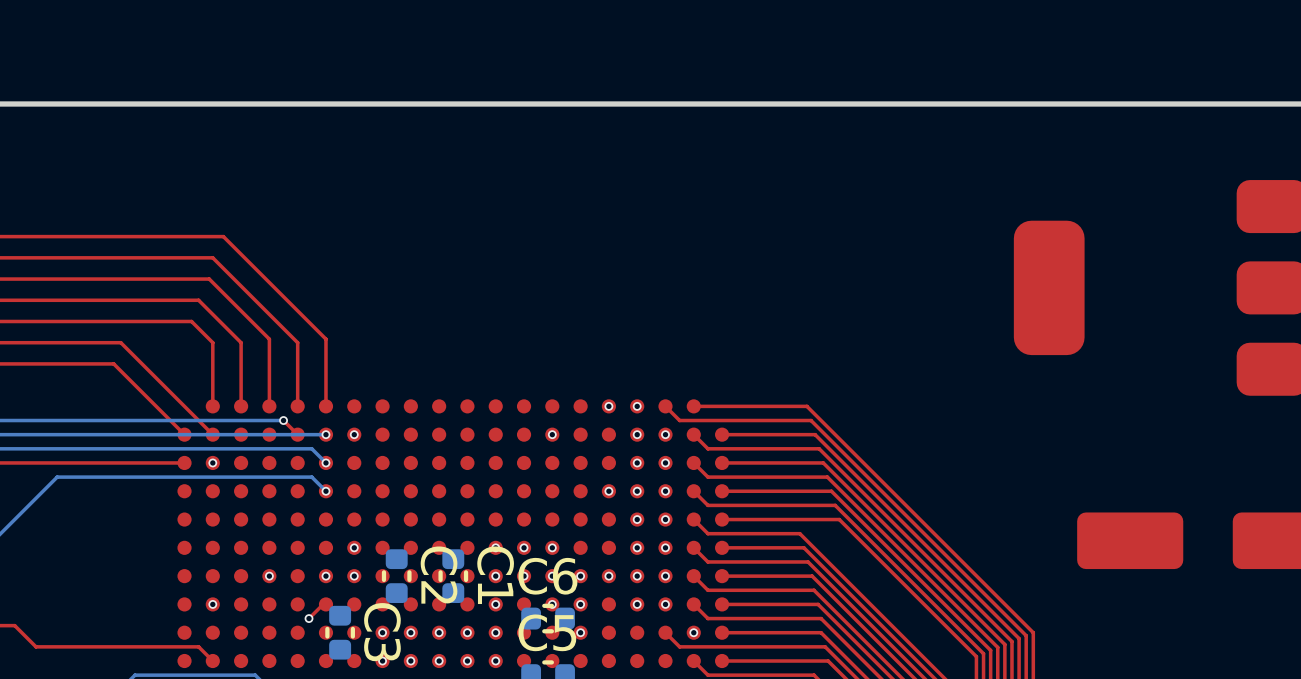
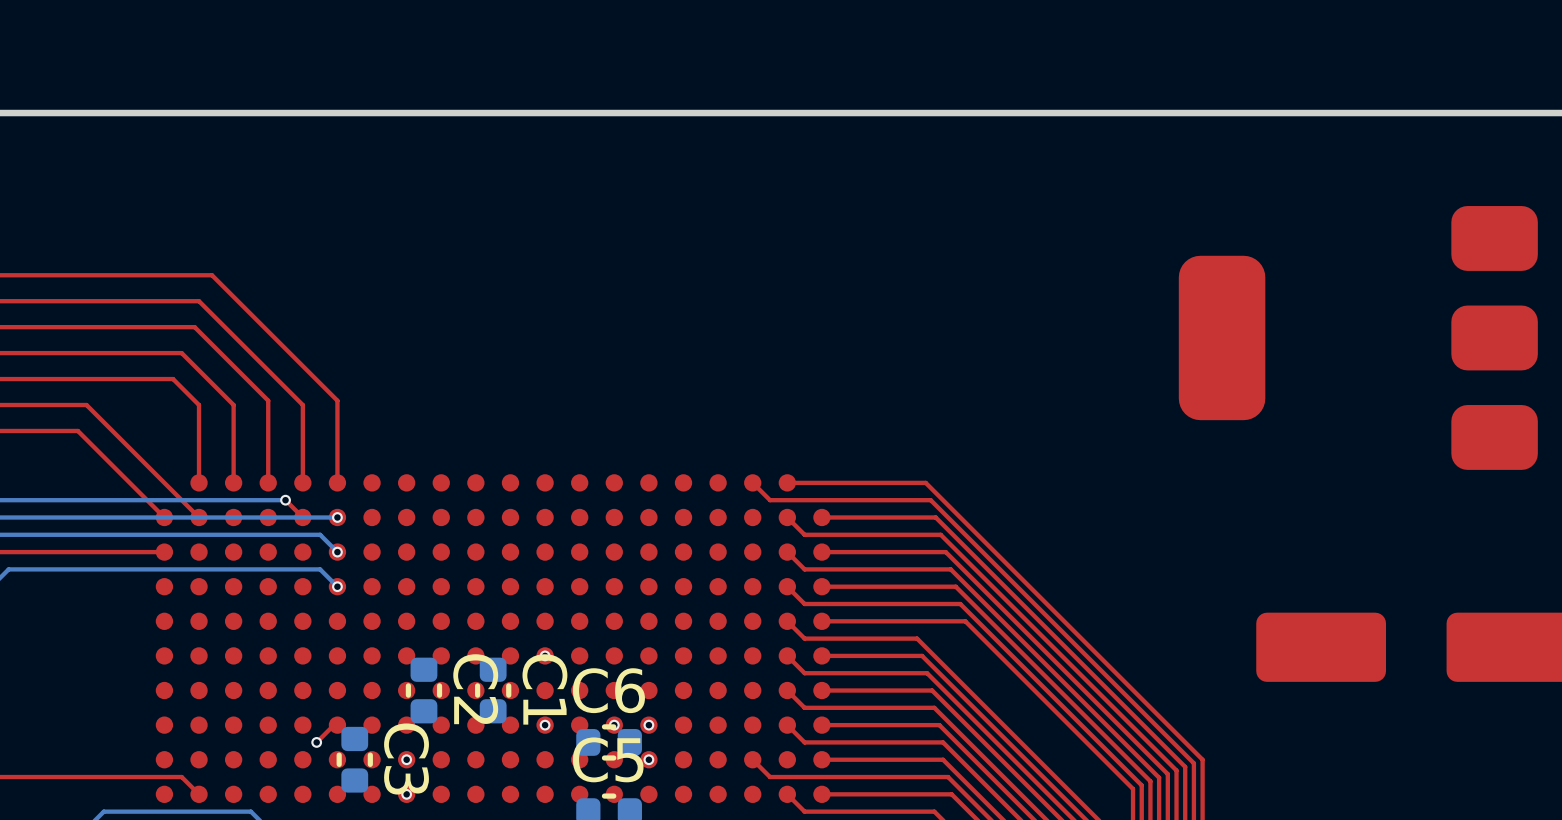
via: (608, 406) -> none
via: (637, 406) -> none
via: (354, 434) -> none
via: (552, 434) -> none
via: (637, 434) -> none
via: (665, 434) -> none
via: (212, 462) -> none
via: (637, 462) -> none
via: (665, 462) -> none
via: (608, 491) -> none
via: (637, 491) -> none
via: (665, 491) -> none
via: (637, 519) -> none
via: (665, 519) -> none
via: (354, 547) -> none
via: (524, 547) -> none
via: (552, 547) -> none
via: (637, 547) -> none
via: (665, 547) -> none
via: (269, 576) -> none
via: (325, 576) -> none
via: (354, 576) -> none
via: (495, 576) -> none
via: (524, 576) -> none
via: (552, 576) -> none
via: (580, 576) -> none
via: (608, 576) -> none
via: (637, 576) -> none
via: (665, 576) -> none
via: (212, 604) -> none
via: (637, 604) -> none
via: (665, 604) -> none
via: (410, 632) -> none
via: (439, 632) -> none
via: (467, 632) -> none
via: (495, 632) -> none
via: (693, 632) -> none
via: (410, 661) -> none
via: (439, 661) -> none
via: (467, 661) -> none
via: (495, 661) -> none

